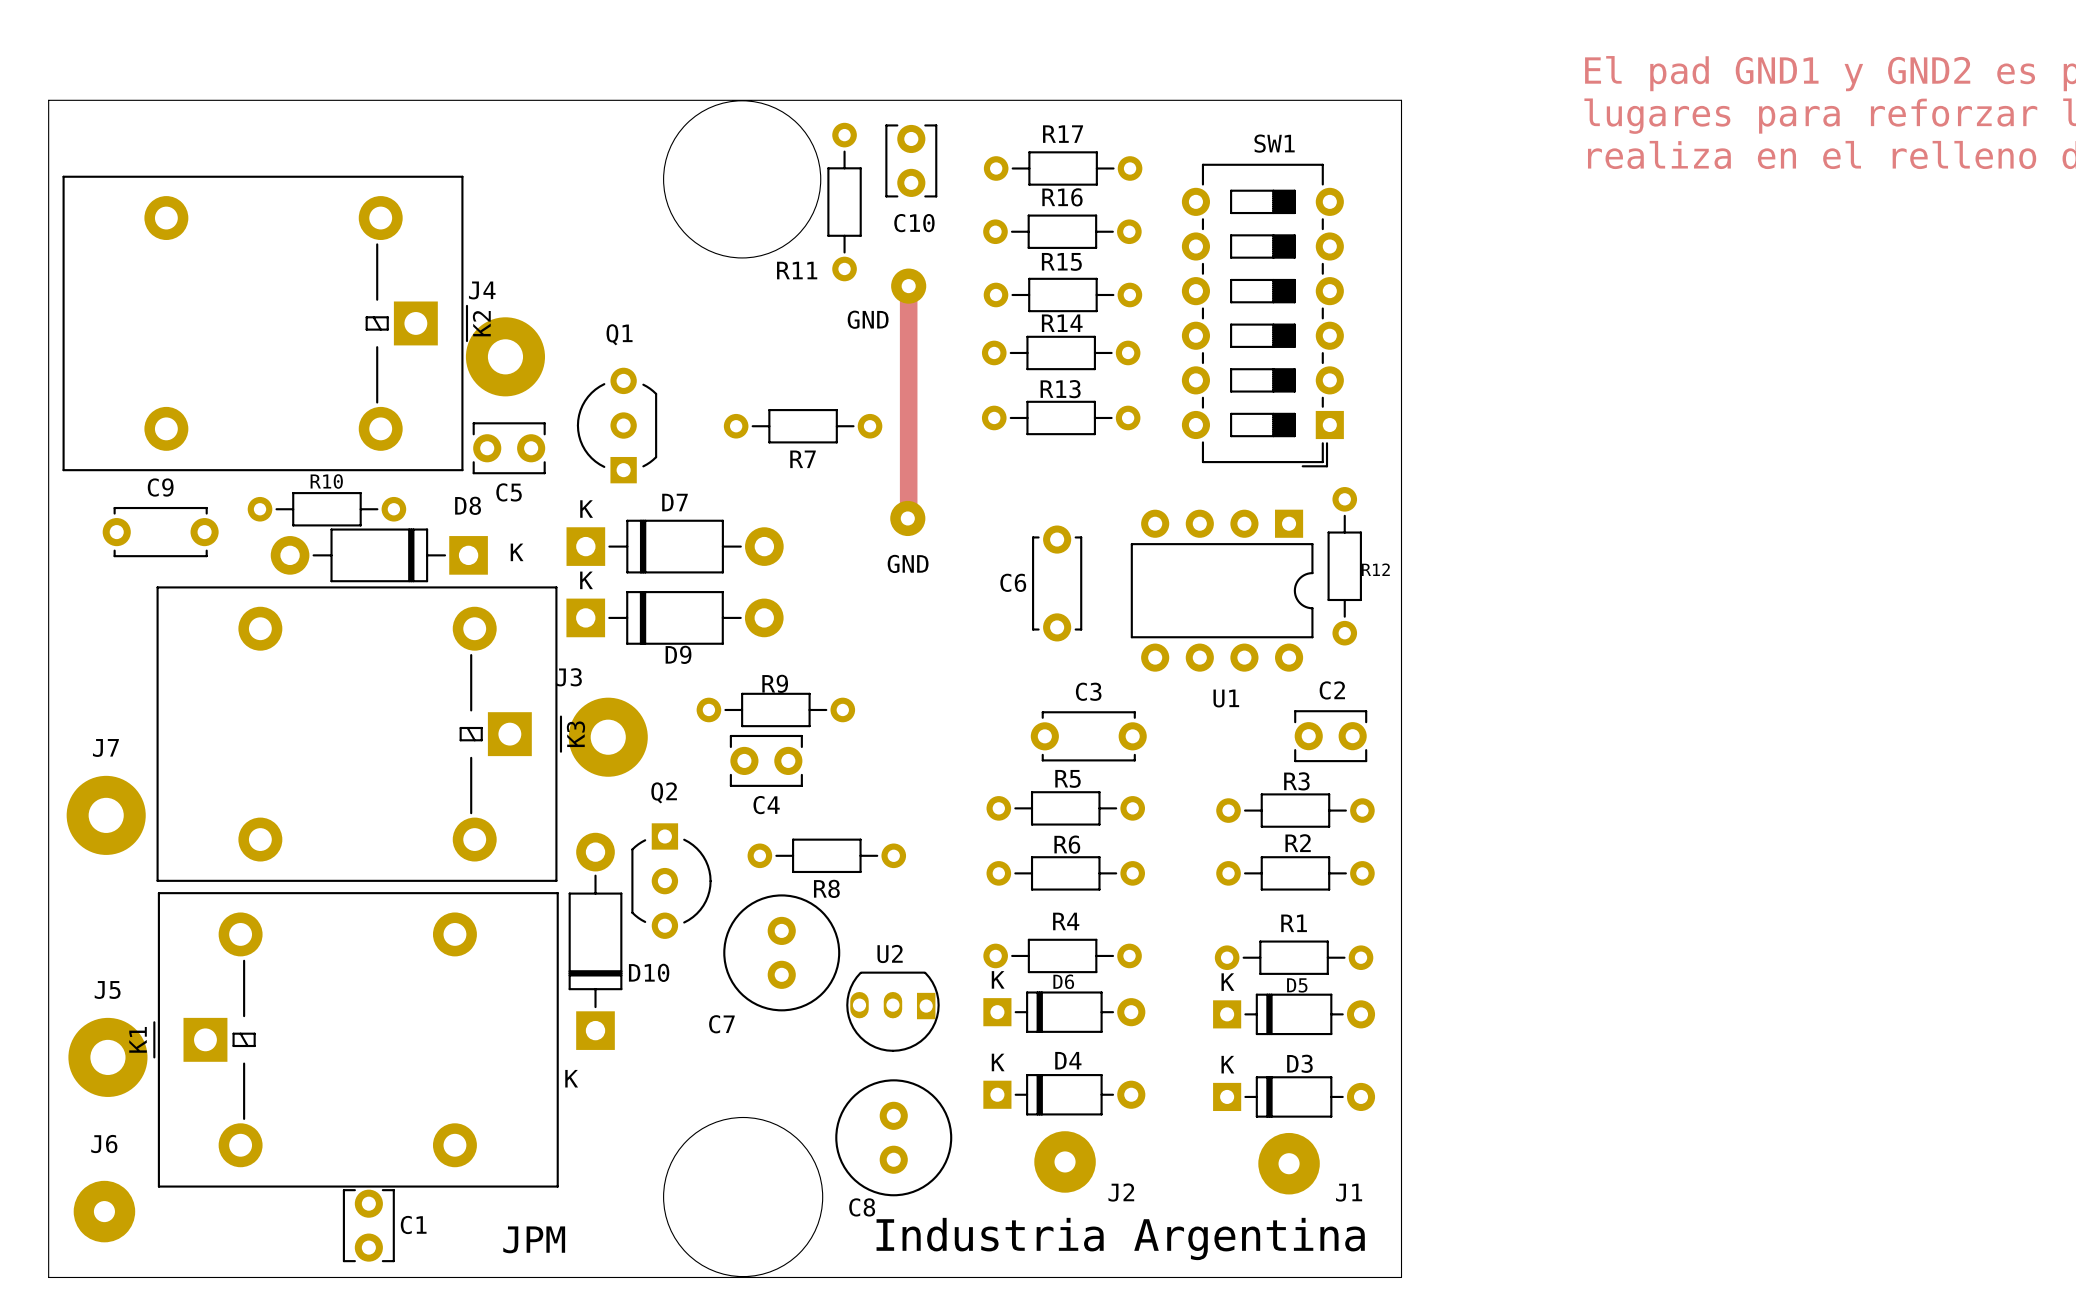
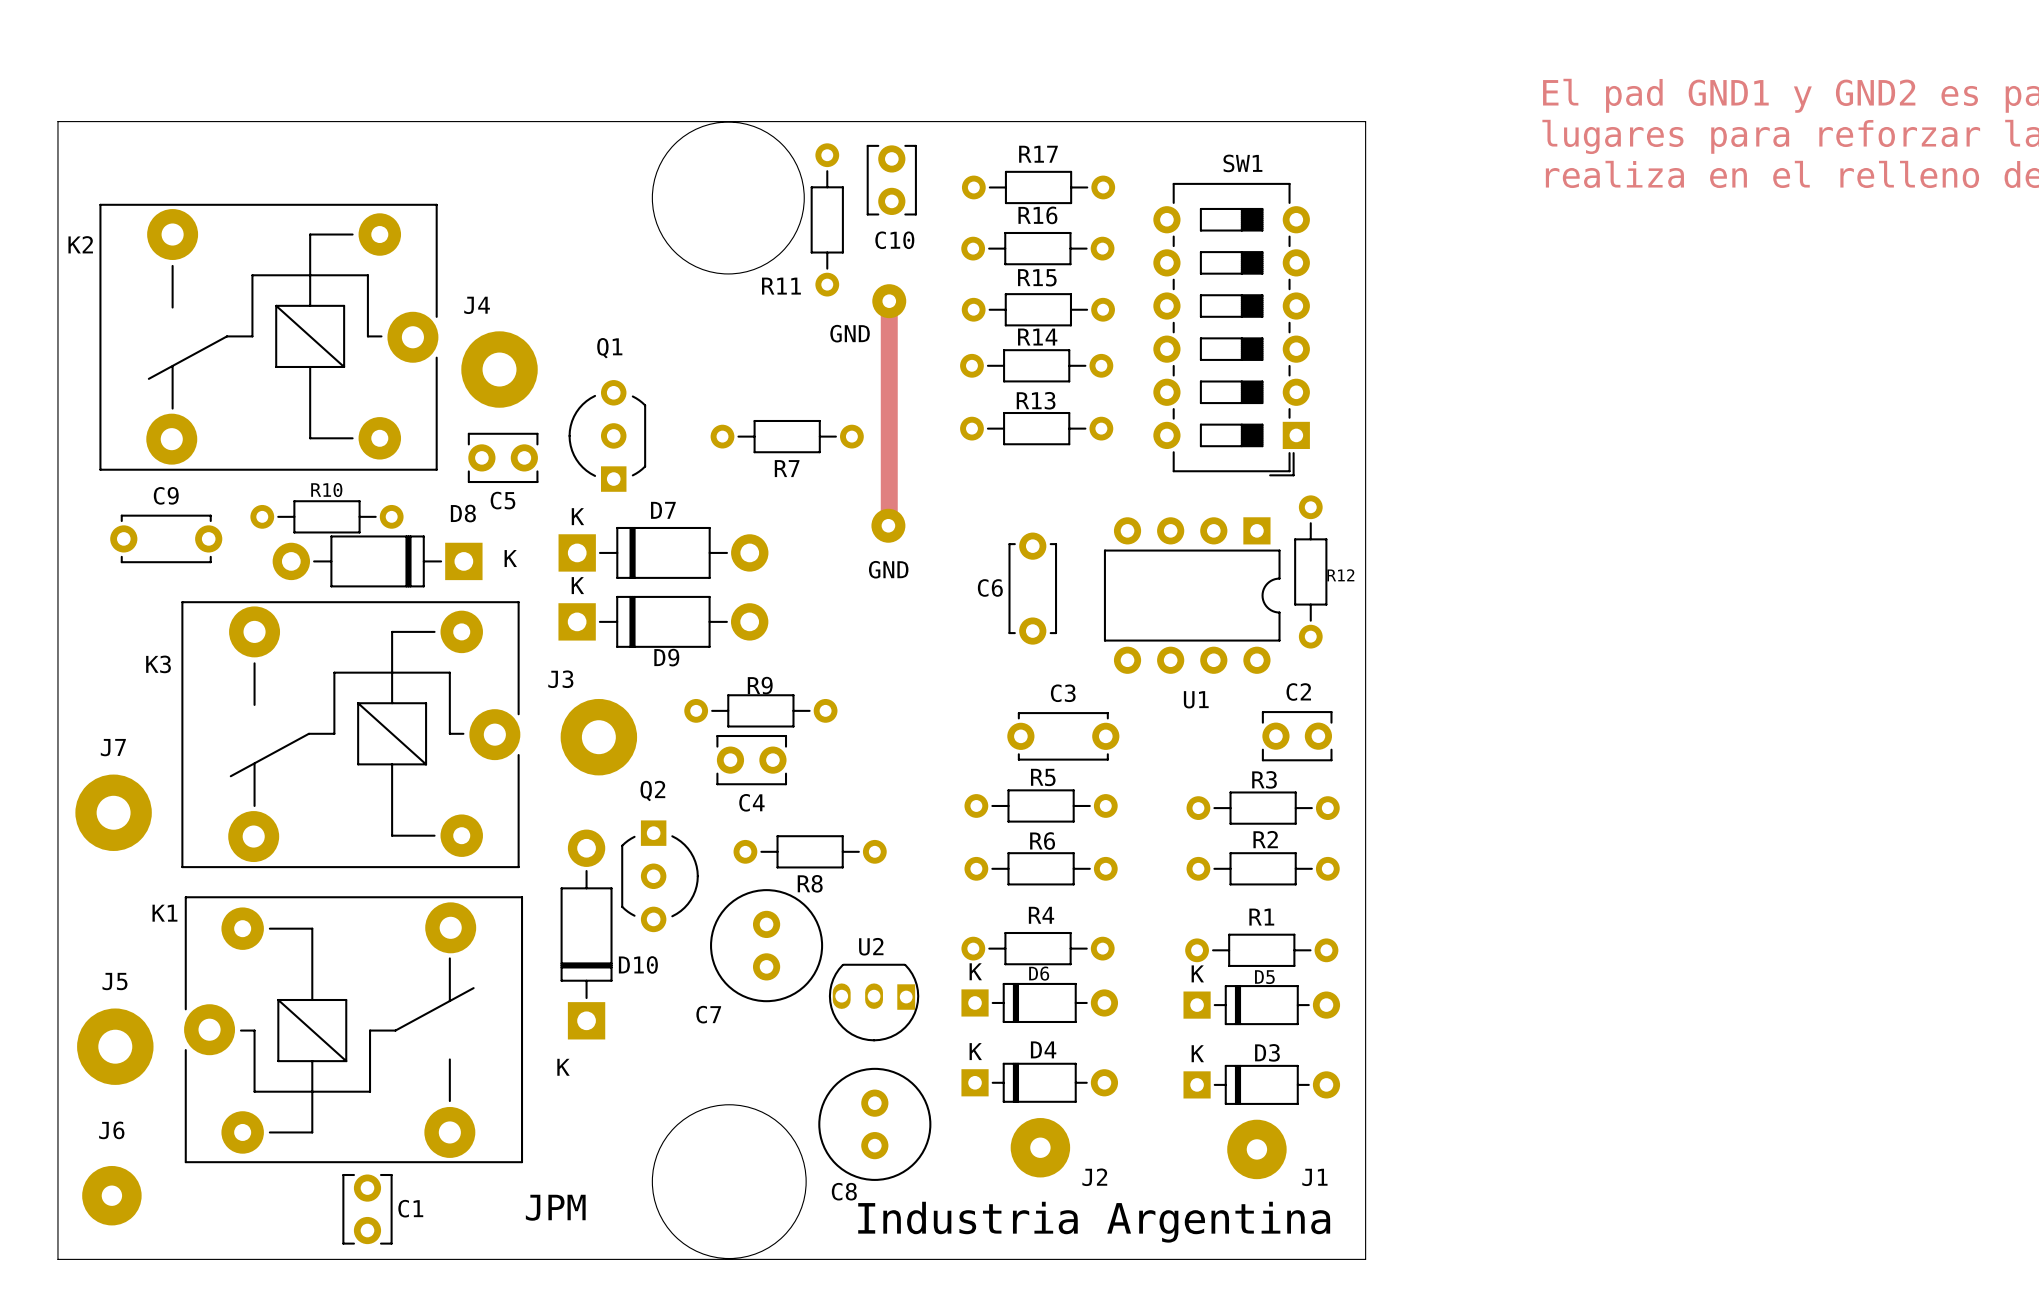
K2 footprint: [62, 175, 469, 472] -> [99, 203, 439, 471]
K2 name position: K2 (481, 323) -> K2 (80, 244)
K3 footprint: [156, 586, 563, 882] -> [181, 601, 521, 869]
K3 name position: K3 (575, 734) -> K3 (158, 664)
K1 footprint: [153, 892, 559, 1188] -> [184, 896, 524, 1164]
K1 name position: K1 (138, 1039) -> K1 (164, 913)
text position: JPM (534, 1239) -> JPM (555, 1207)

